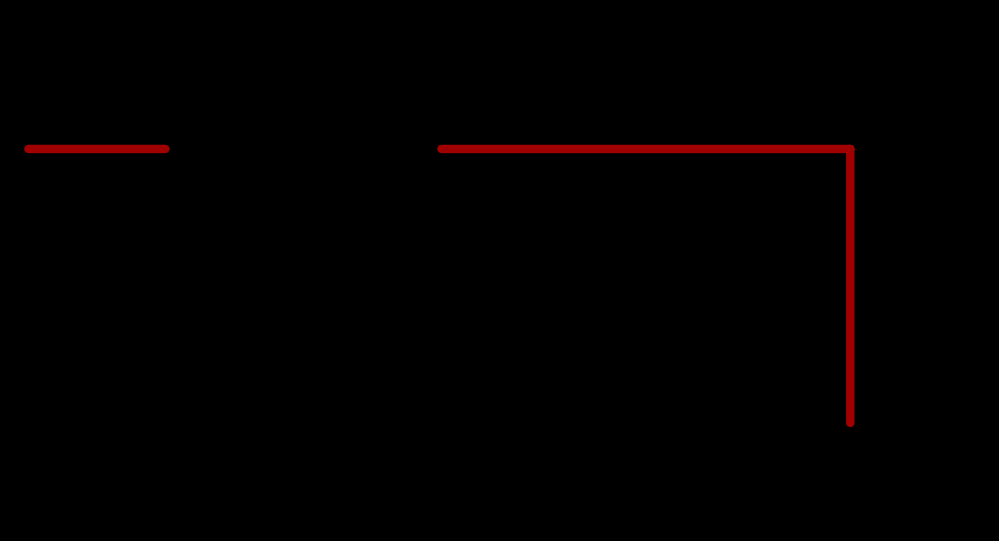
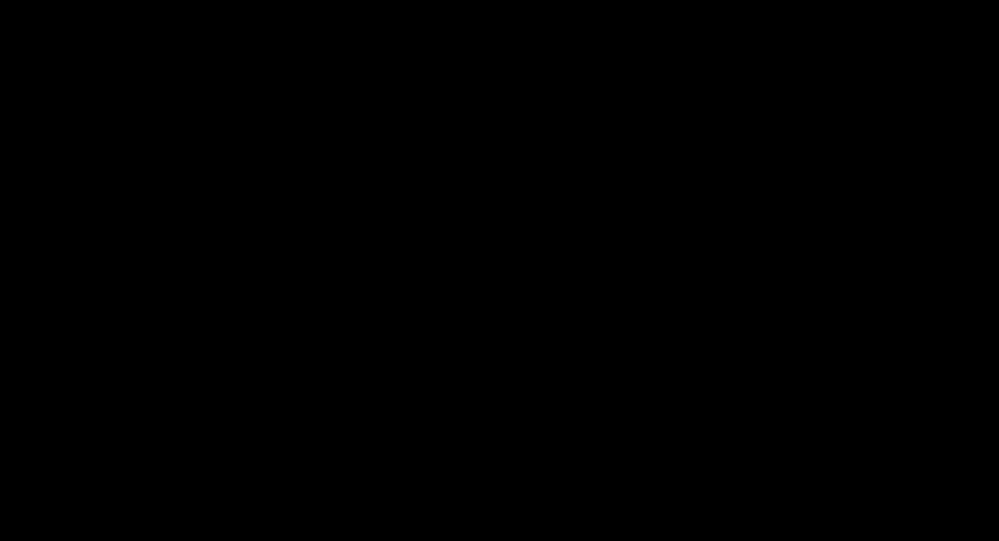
top track: (165, 148) (28, 148) -> none
top track: (441, 148) (850, 148) (850, 422) -> none

